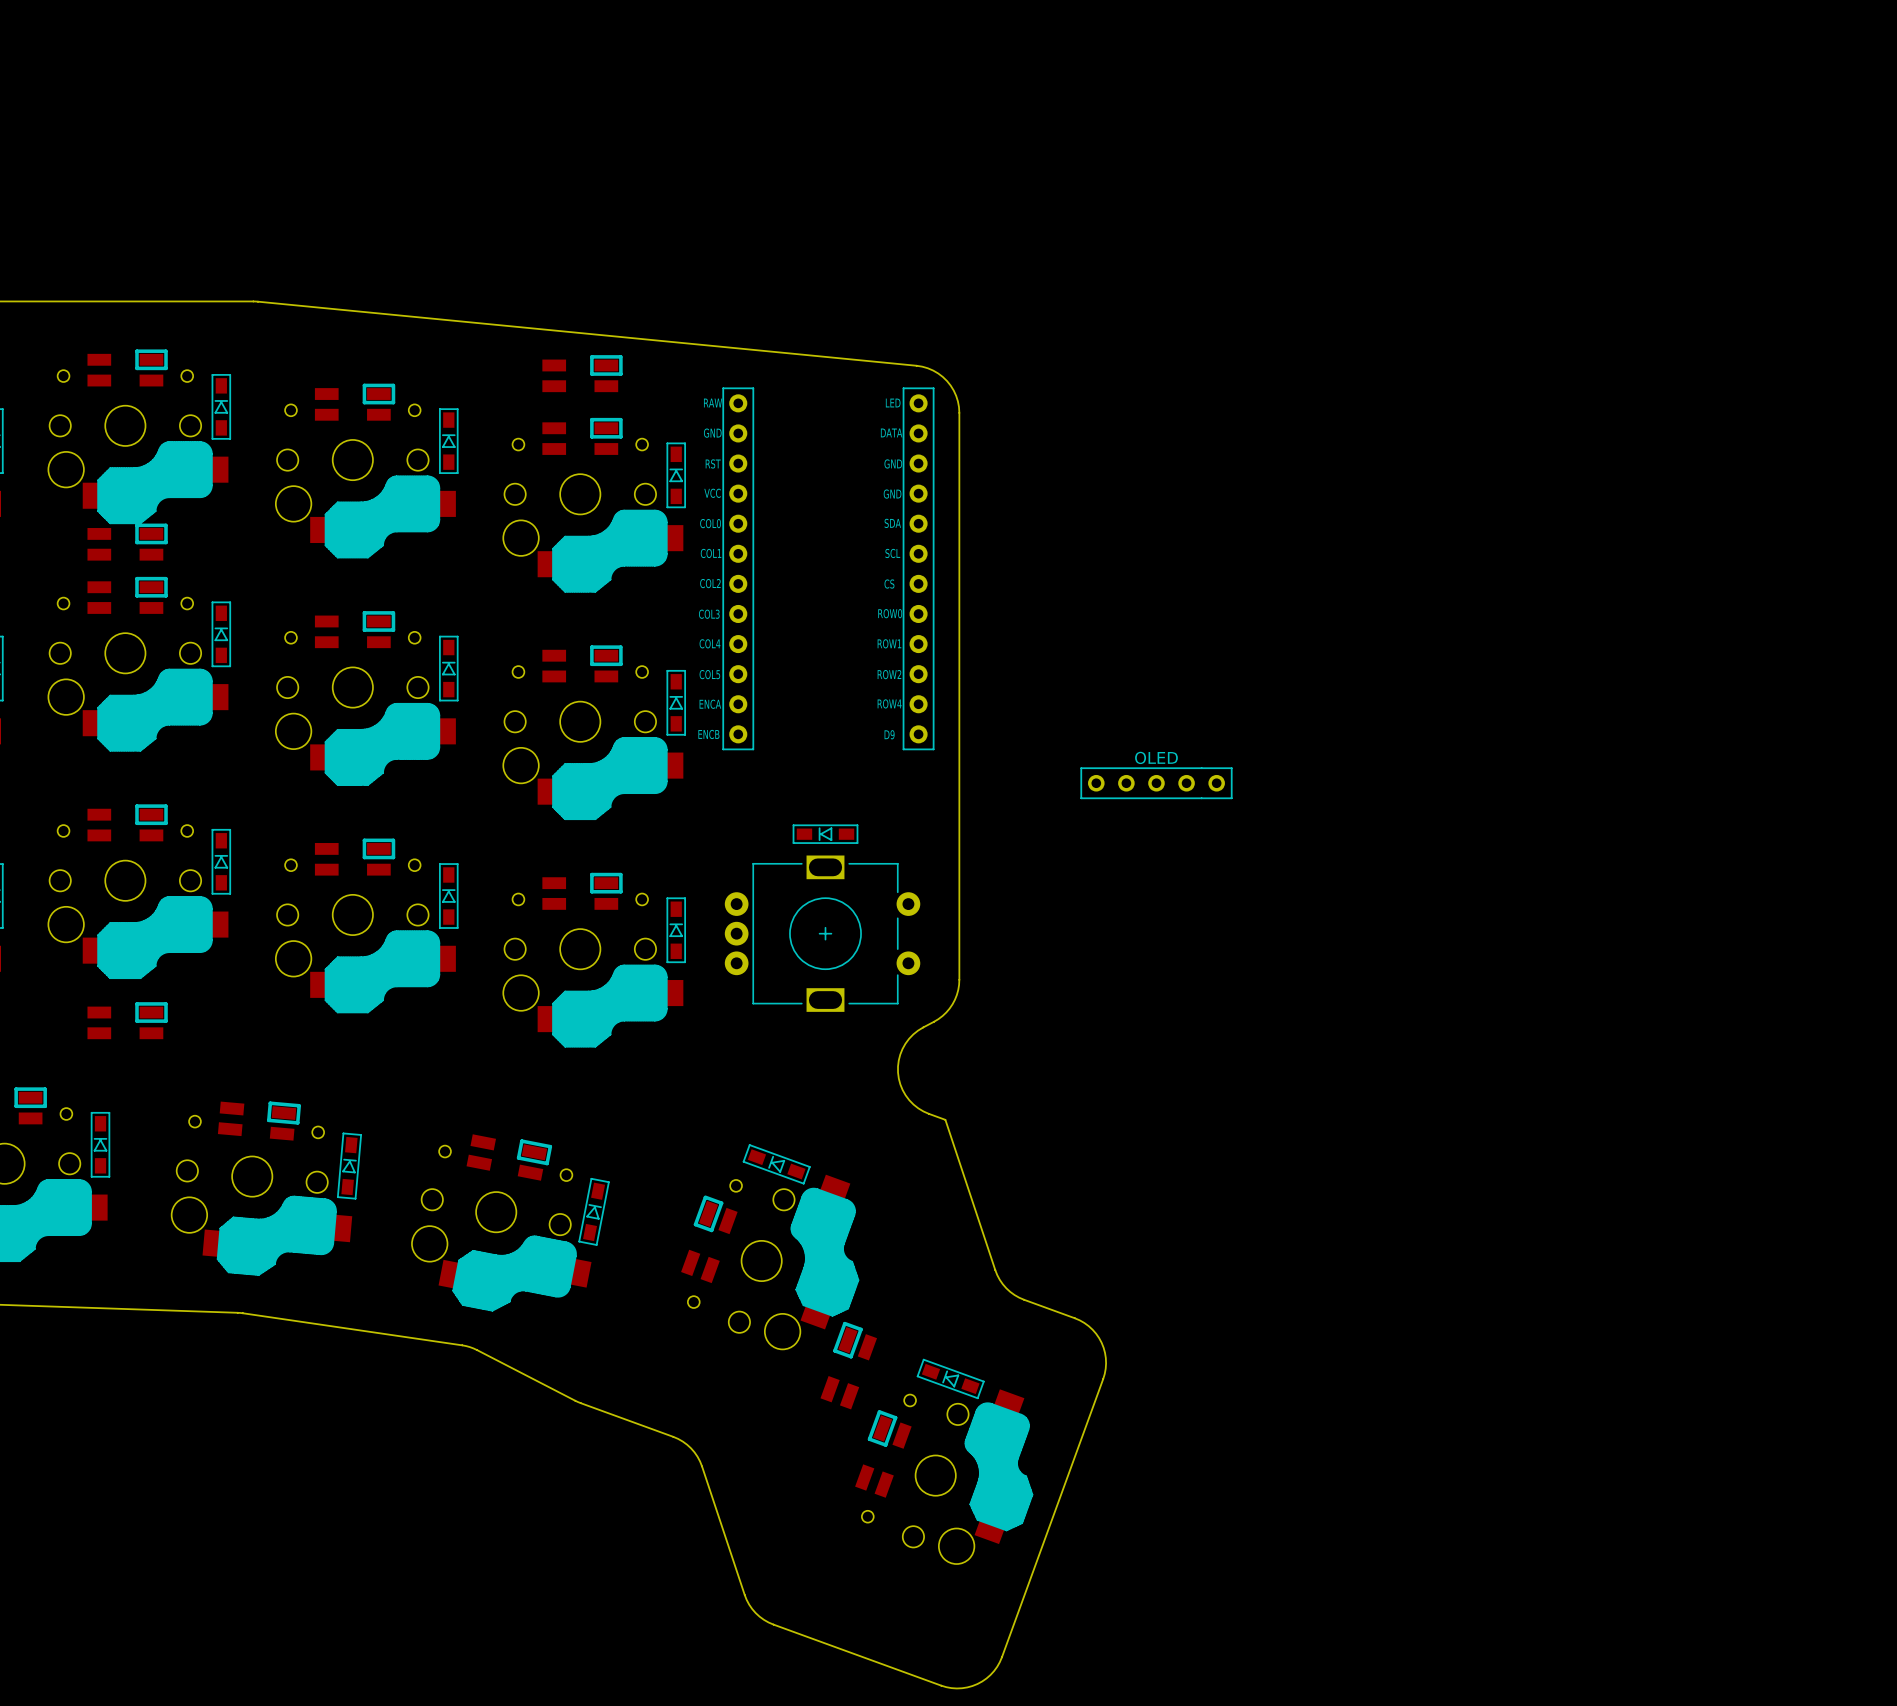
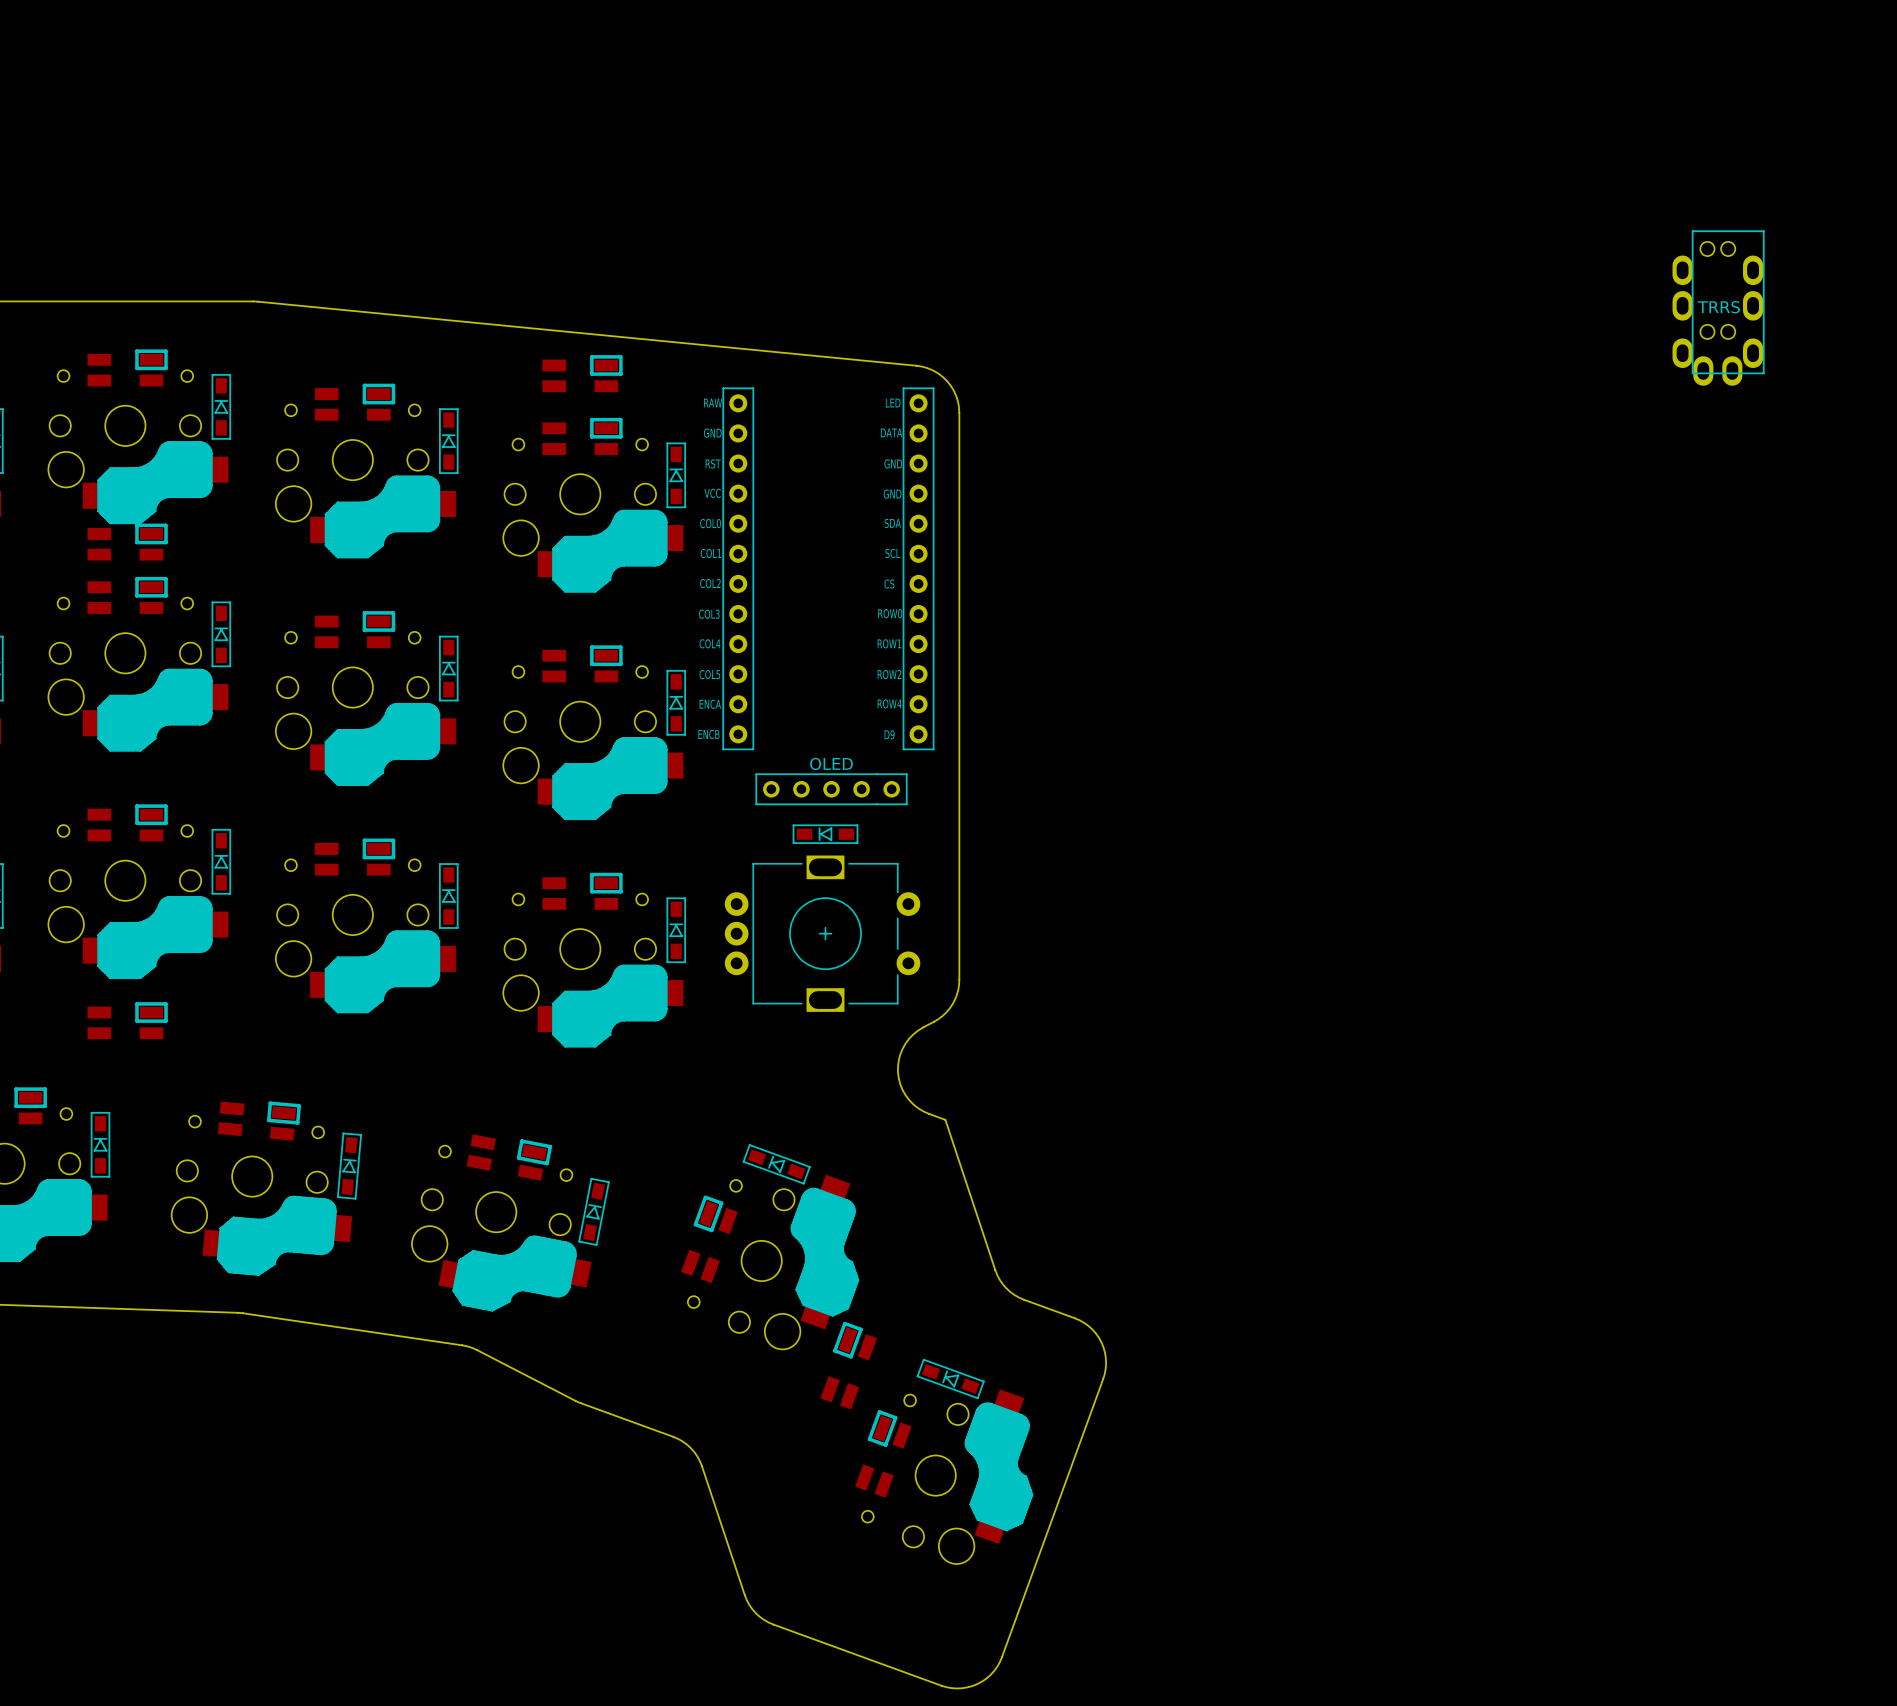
part: none -> (1718, 308)
part: (1156, 783) -> none
part: none -> (831, 789)

